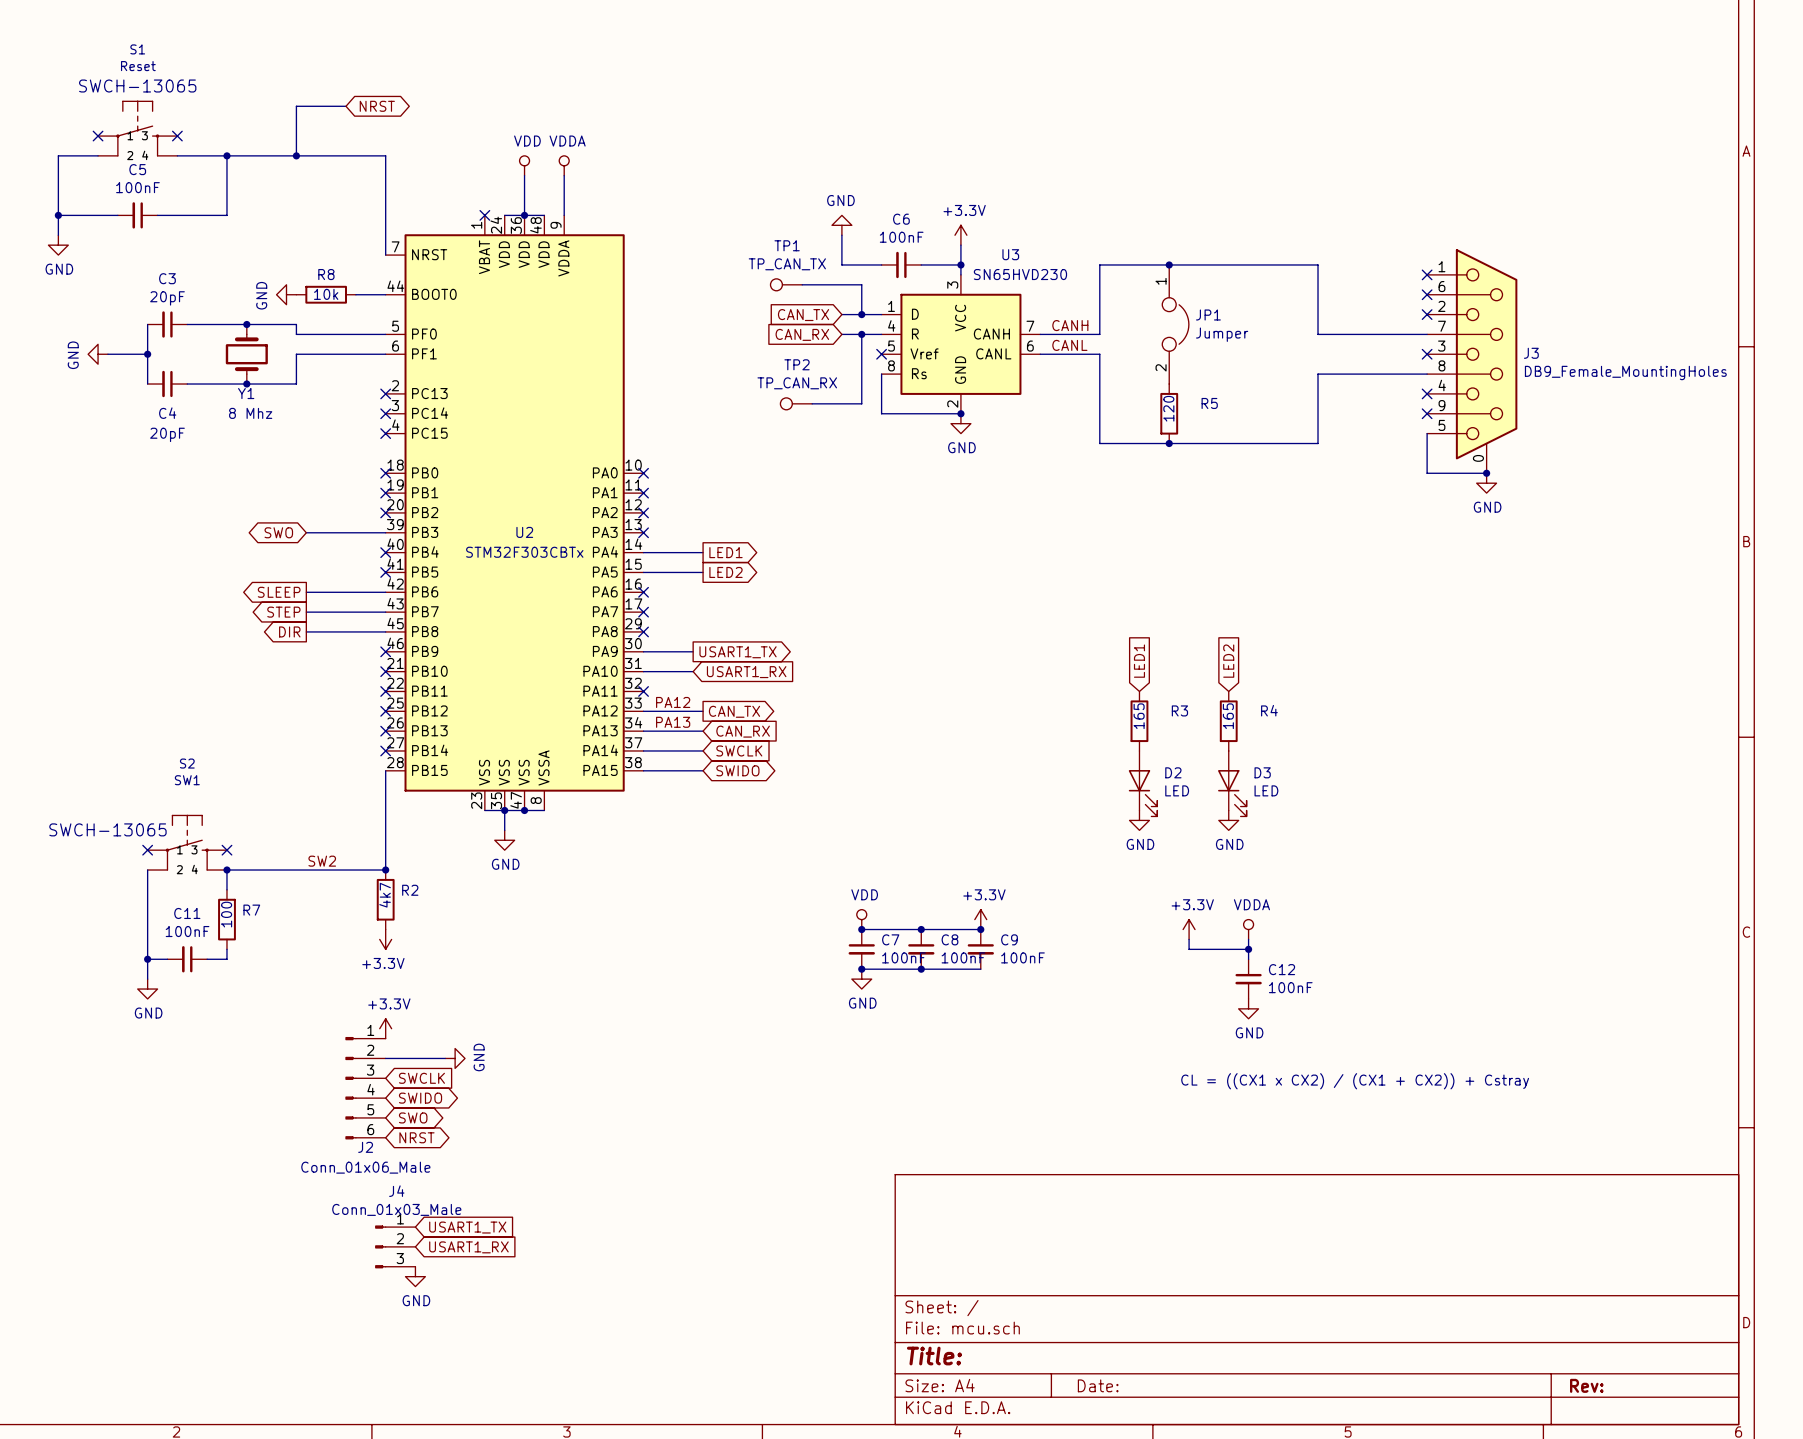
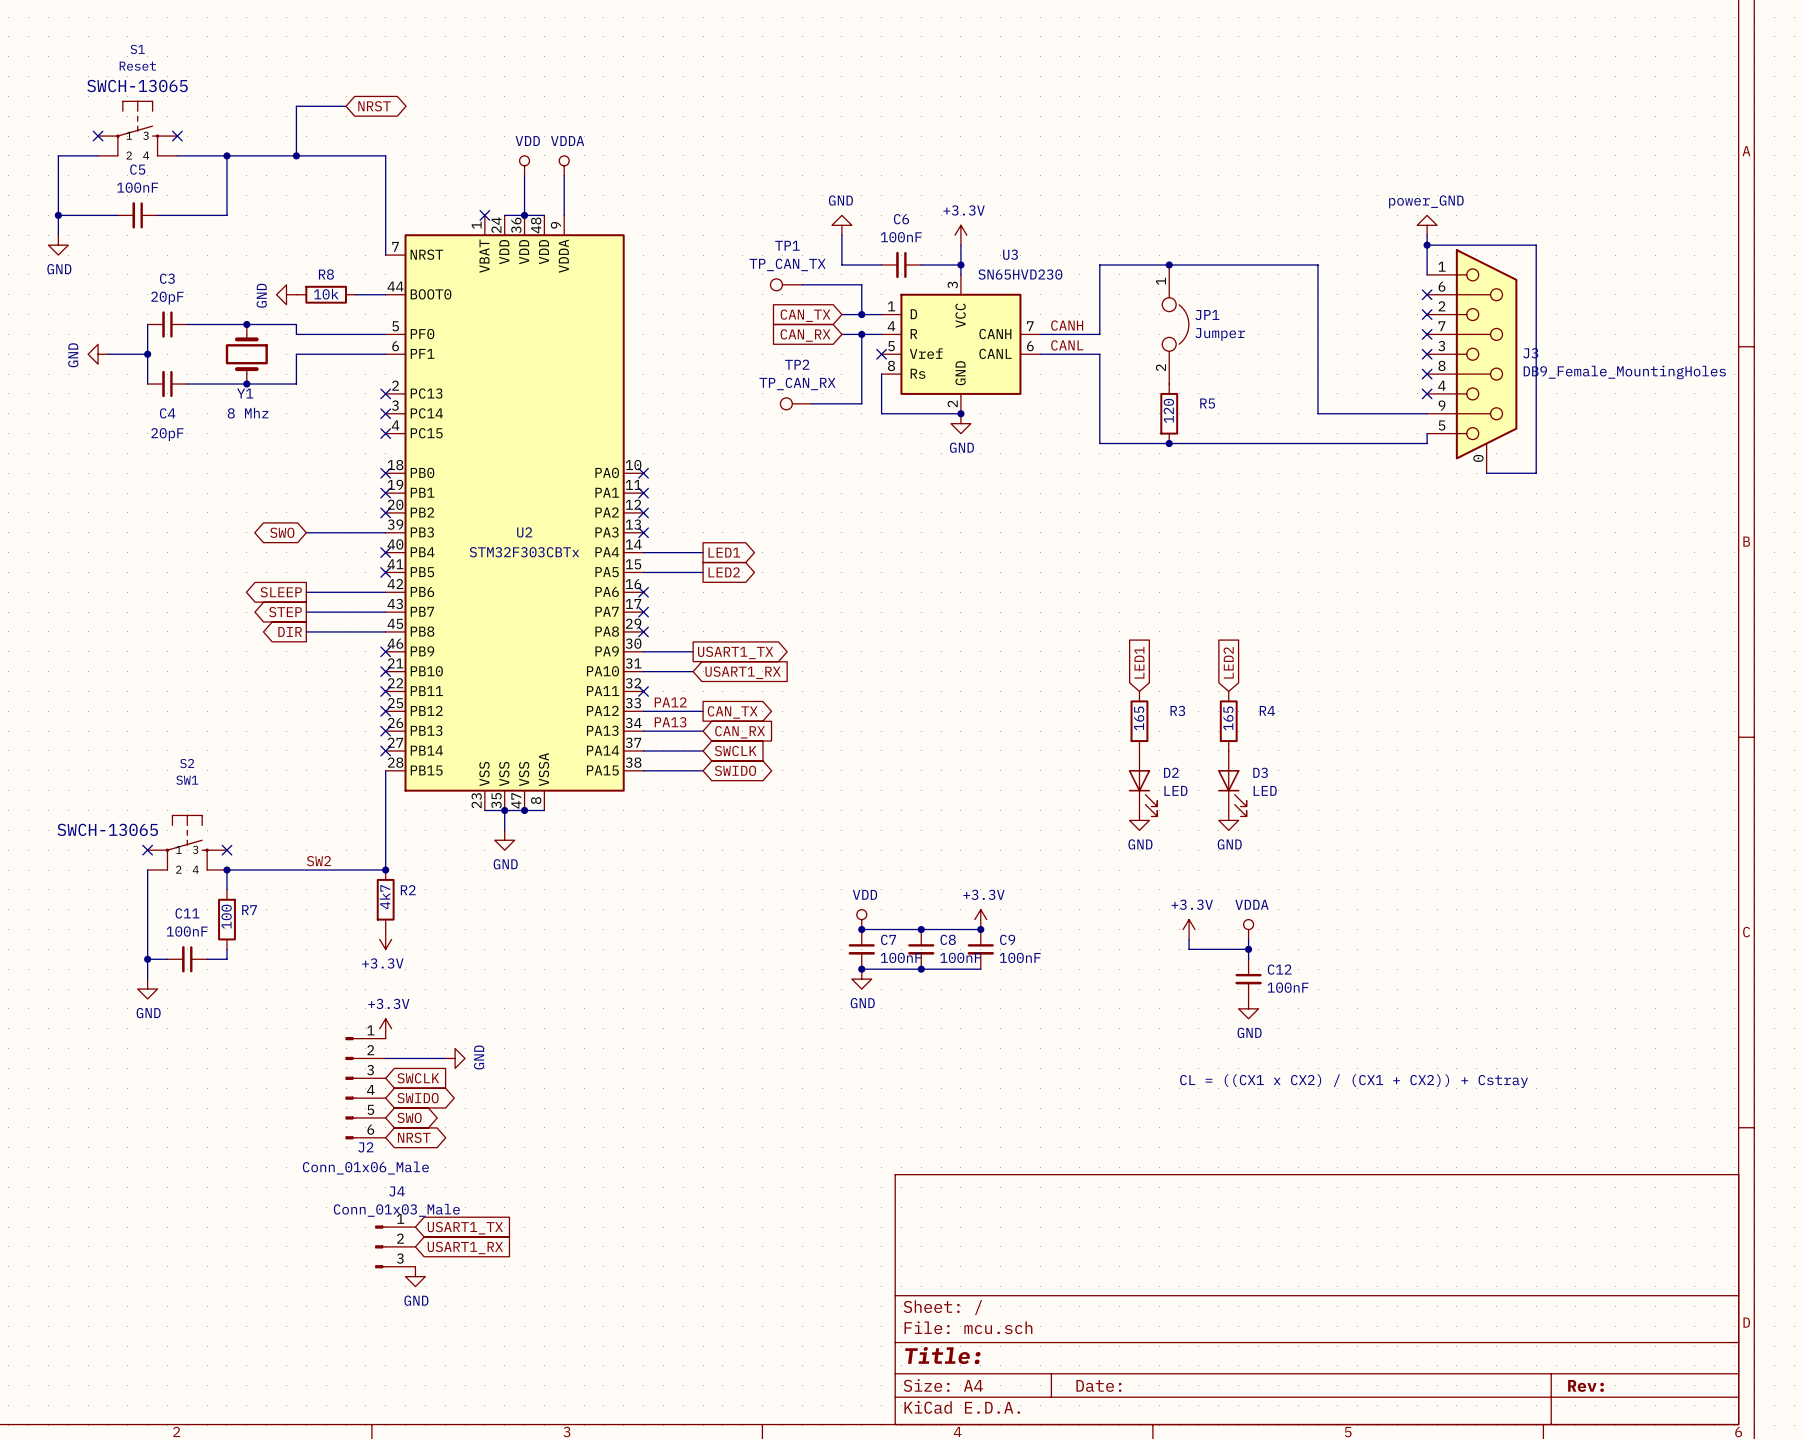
power symbol: none -> power_GND (1427, 225)
wire: none -> (1427, 235) (1427, 274)
wire: none -> (1427, 245) (1536, 245) (1536, 473) (1486, 473)
junction: none -> (1427, 245)
no-connect mark: (1427, 274) -> none
wire: (1318, 334) (1427, 334) -> (1318, 334) (1318, 374)
no-connect mark: none -> (1427, 334)
wire: (1318, 374) (1427, 374) -> none
no-connect mark: none -> (1427, 374)
wire: (1318, 413) (1318, 443) -> (1318, 413) (1427, 413)
no-connect mark: (1427, 413) -> none
wire: (1427, 443) (1427, 473) (1486, 473) -> (1427, 443) (1318, 443)
junction: (1486, 473) -> none
power symbol: GND (1486, 483) -> none

